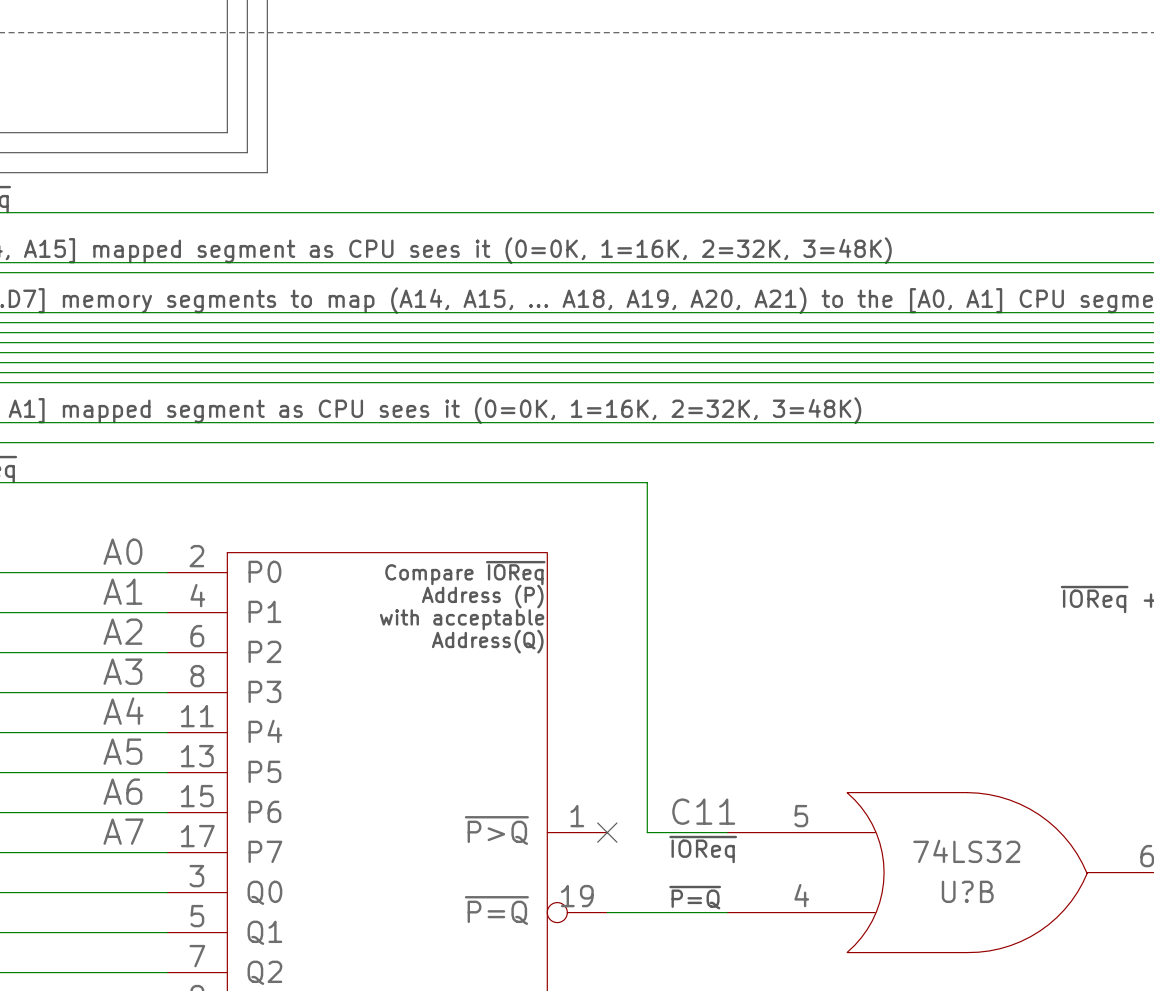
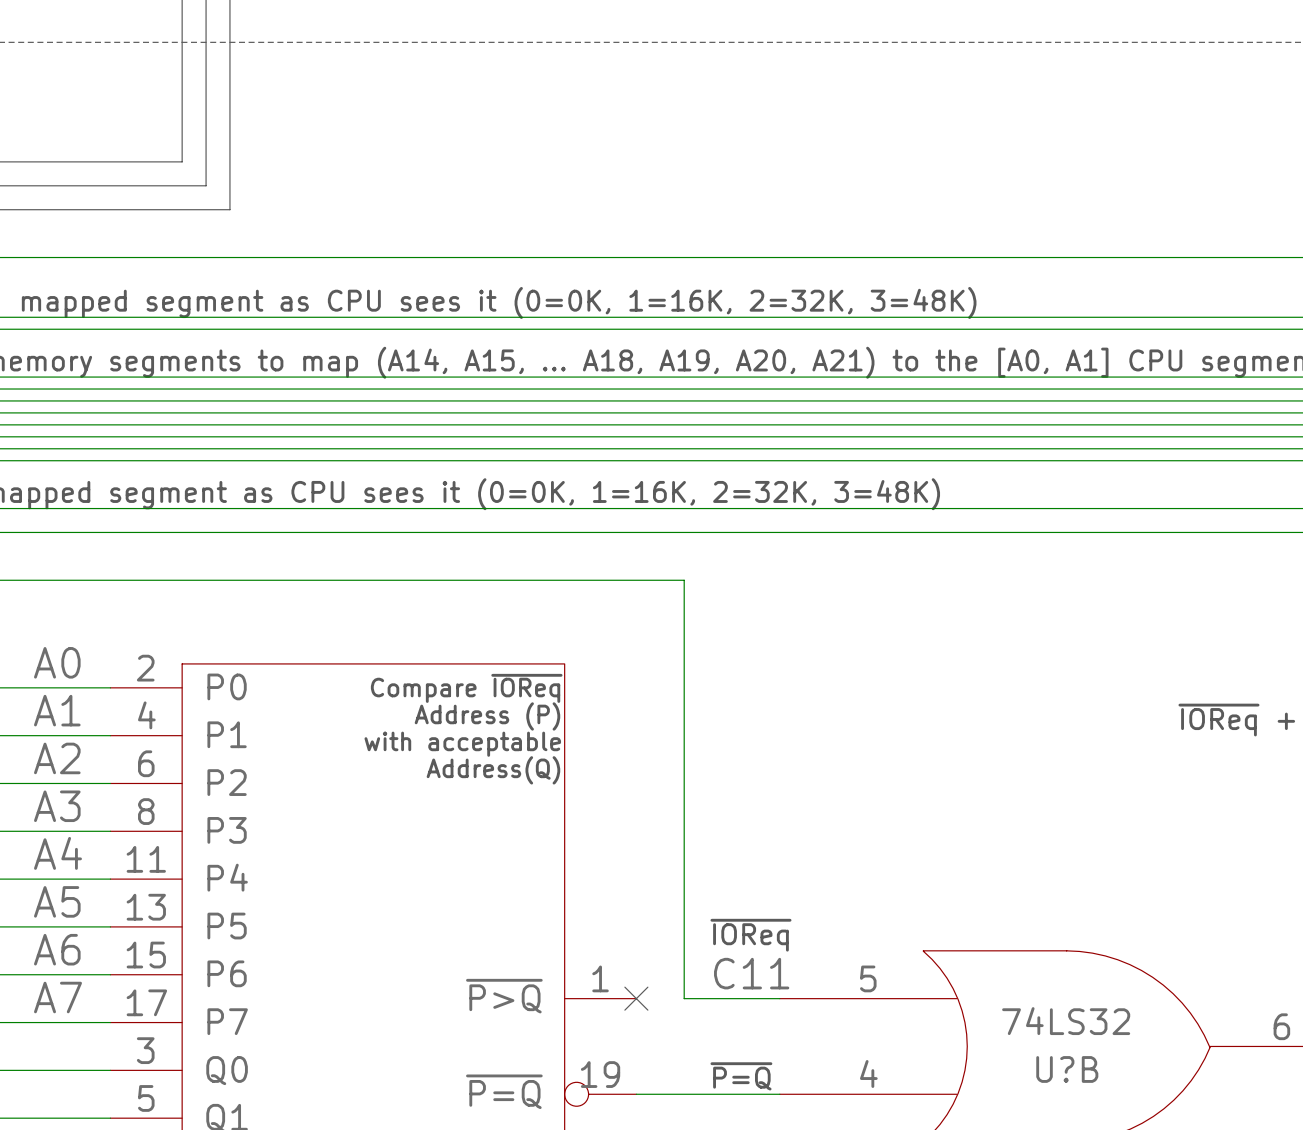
text position: ~{IOReq} (703, 849) -> ~{IOReq} (750, 935)

